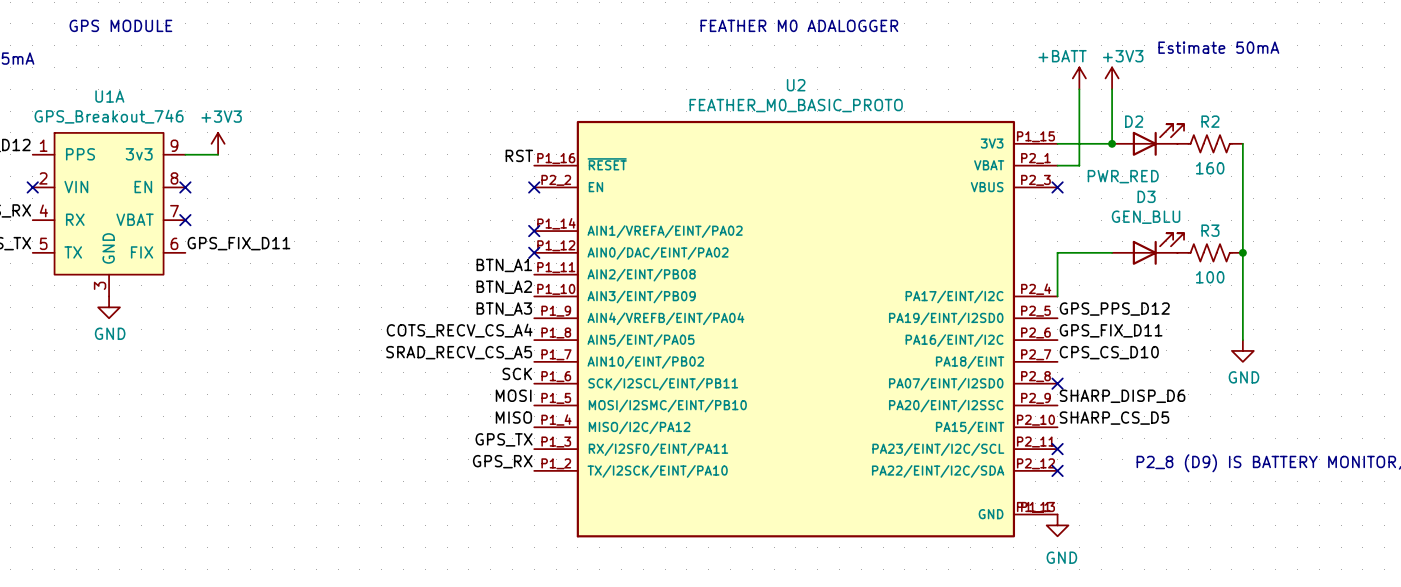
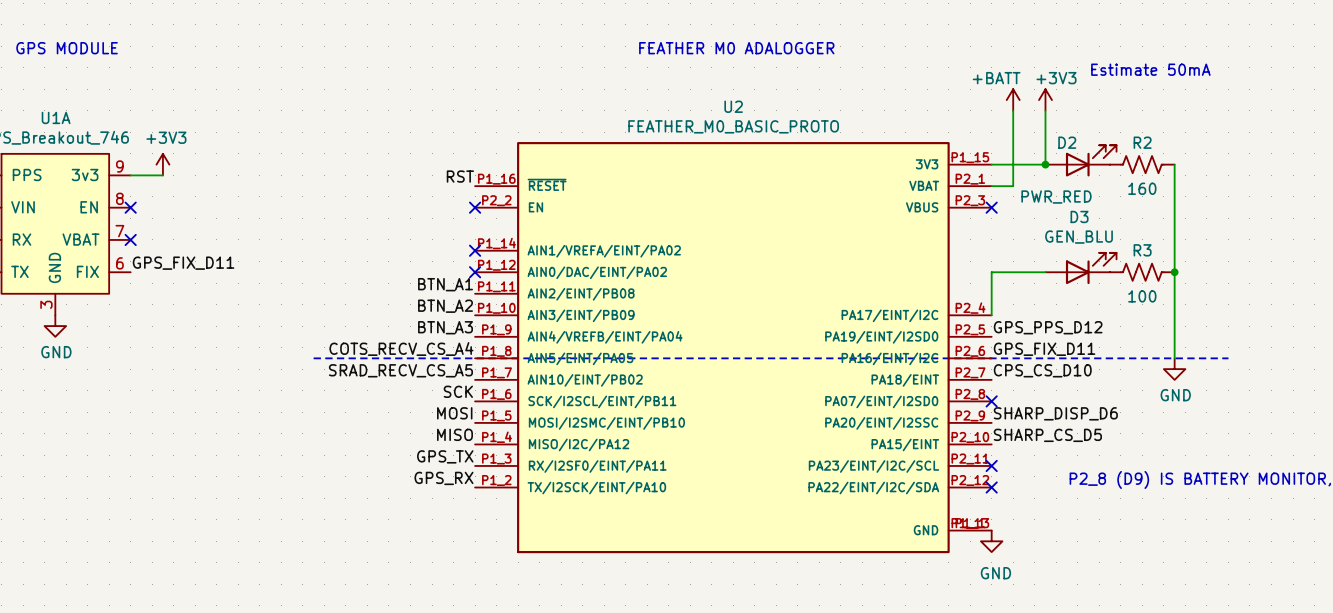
line: none -> (313, 358) (1228, 358)

